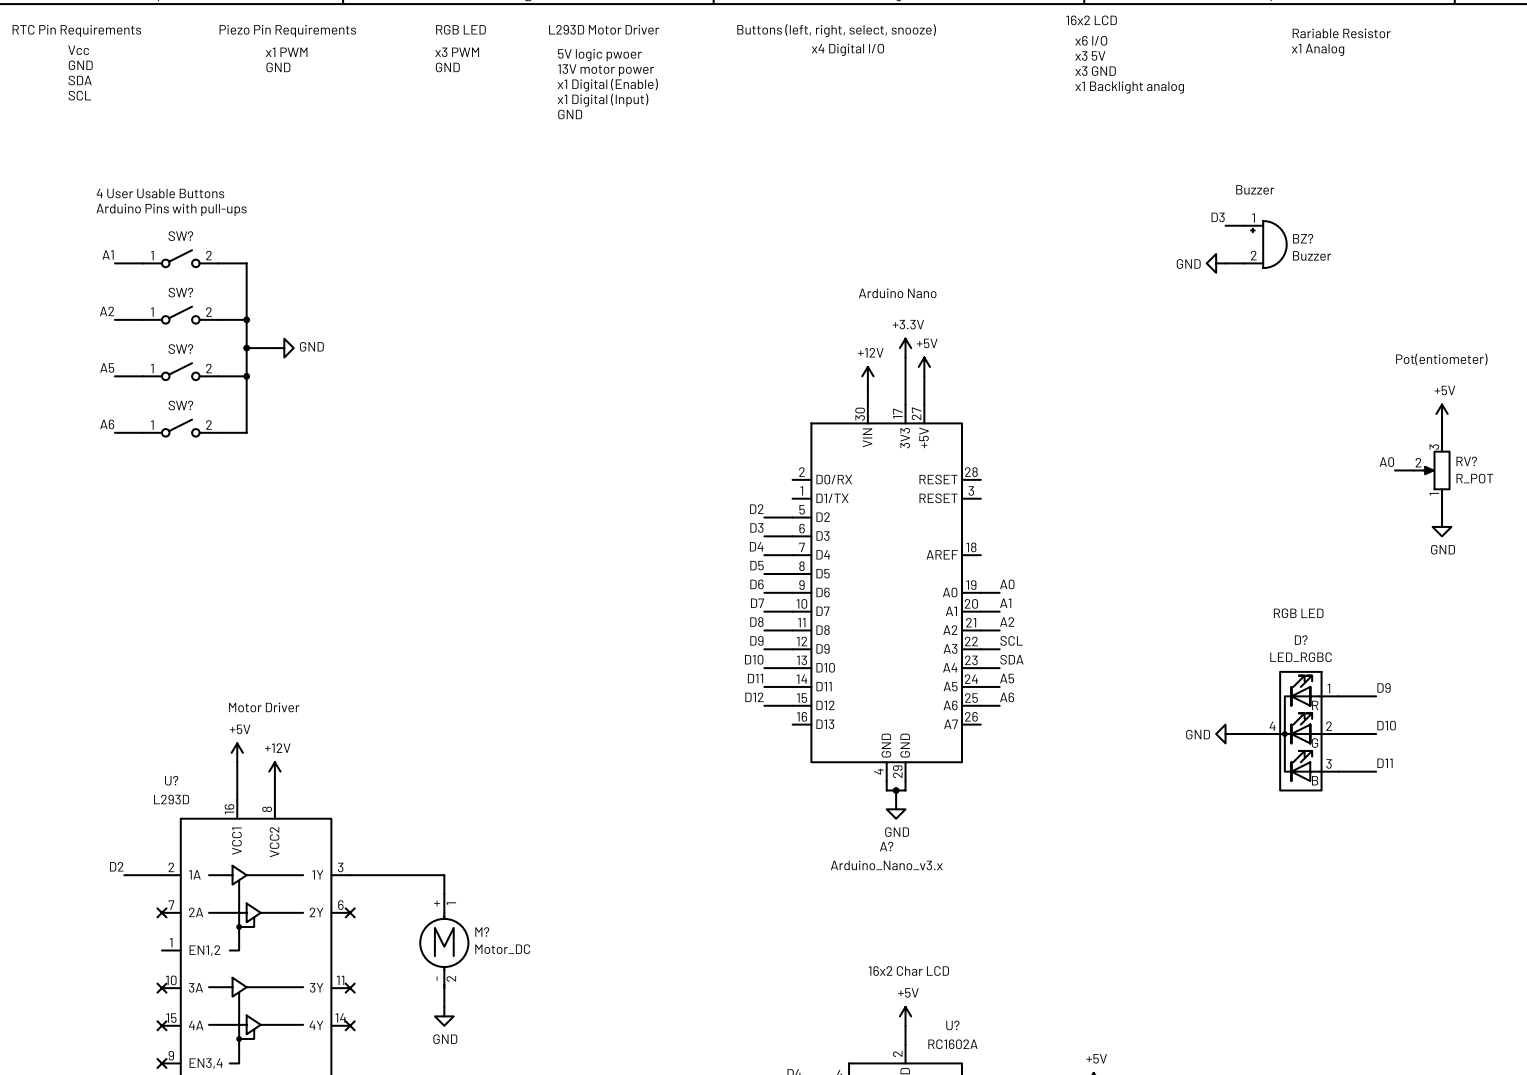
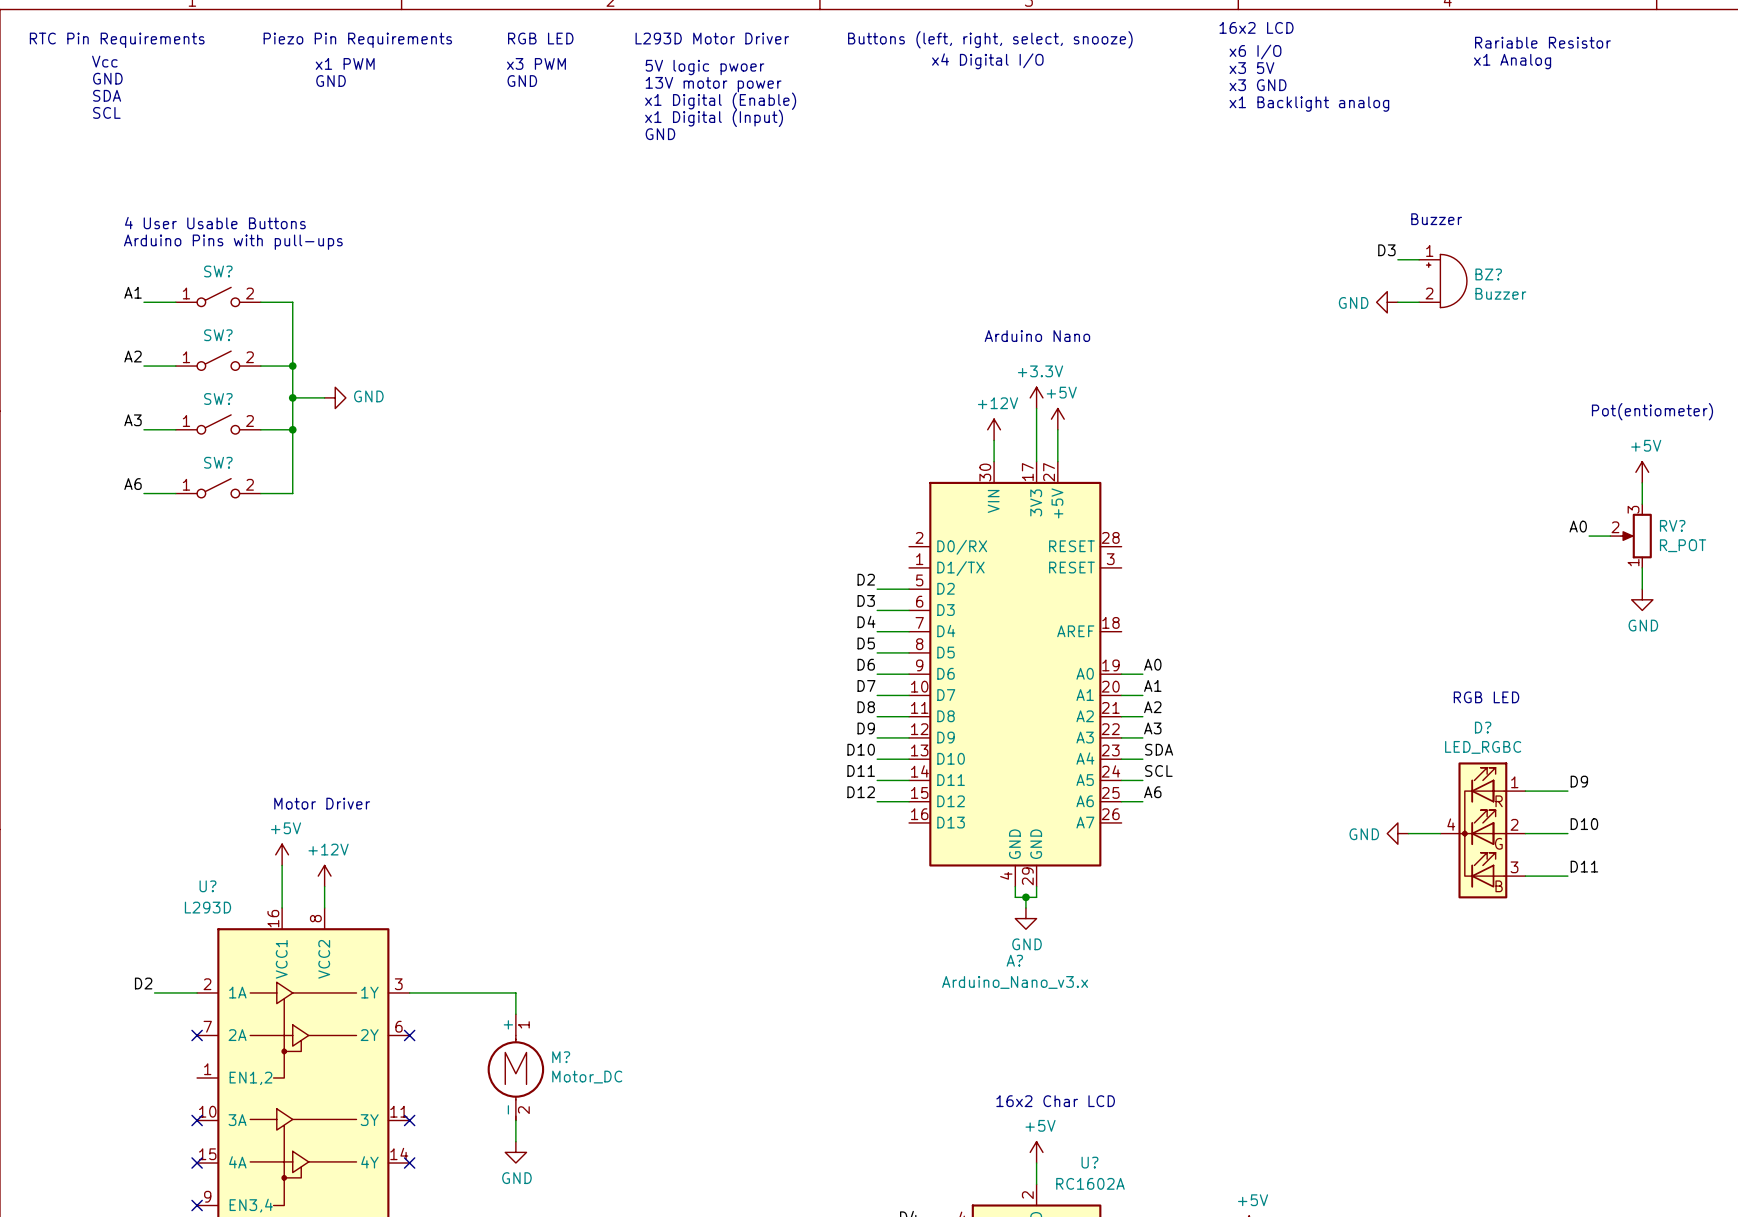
label: A5 (107, 367) -> A3 (133, 420)
label: SCL (1011, 640) -> A3 (1152, 728)
label: A5 (1007, 678) -> SCL (1158, 770)

